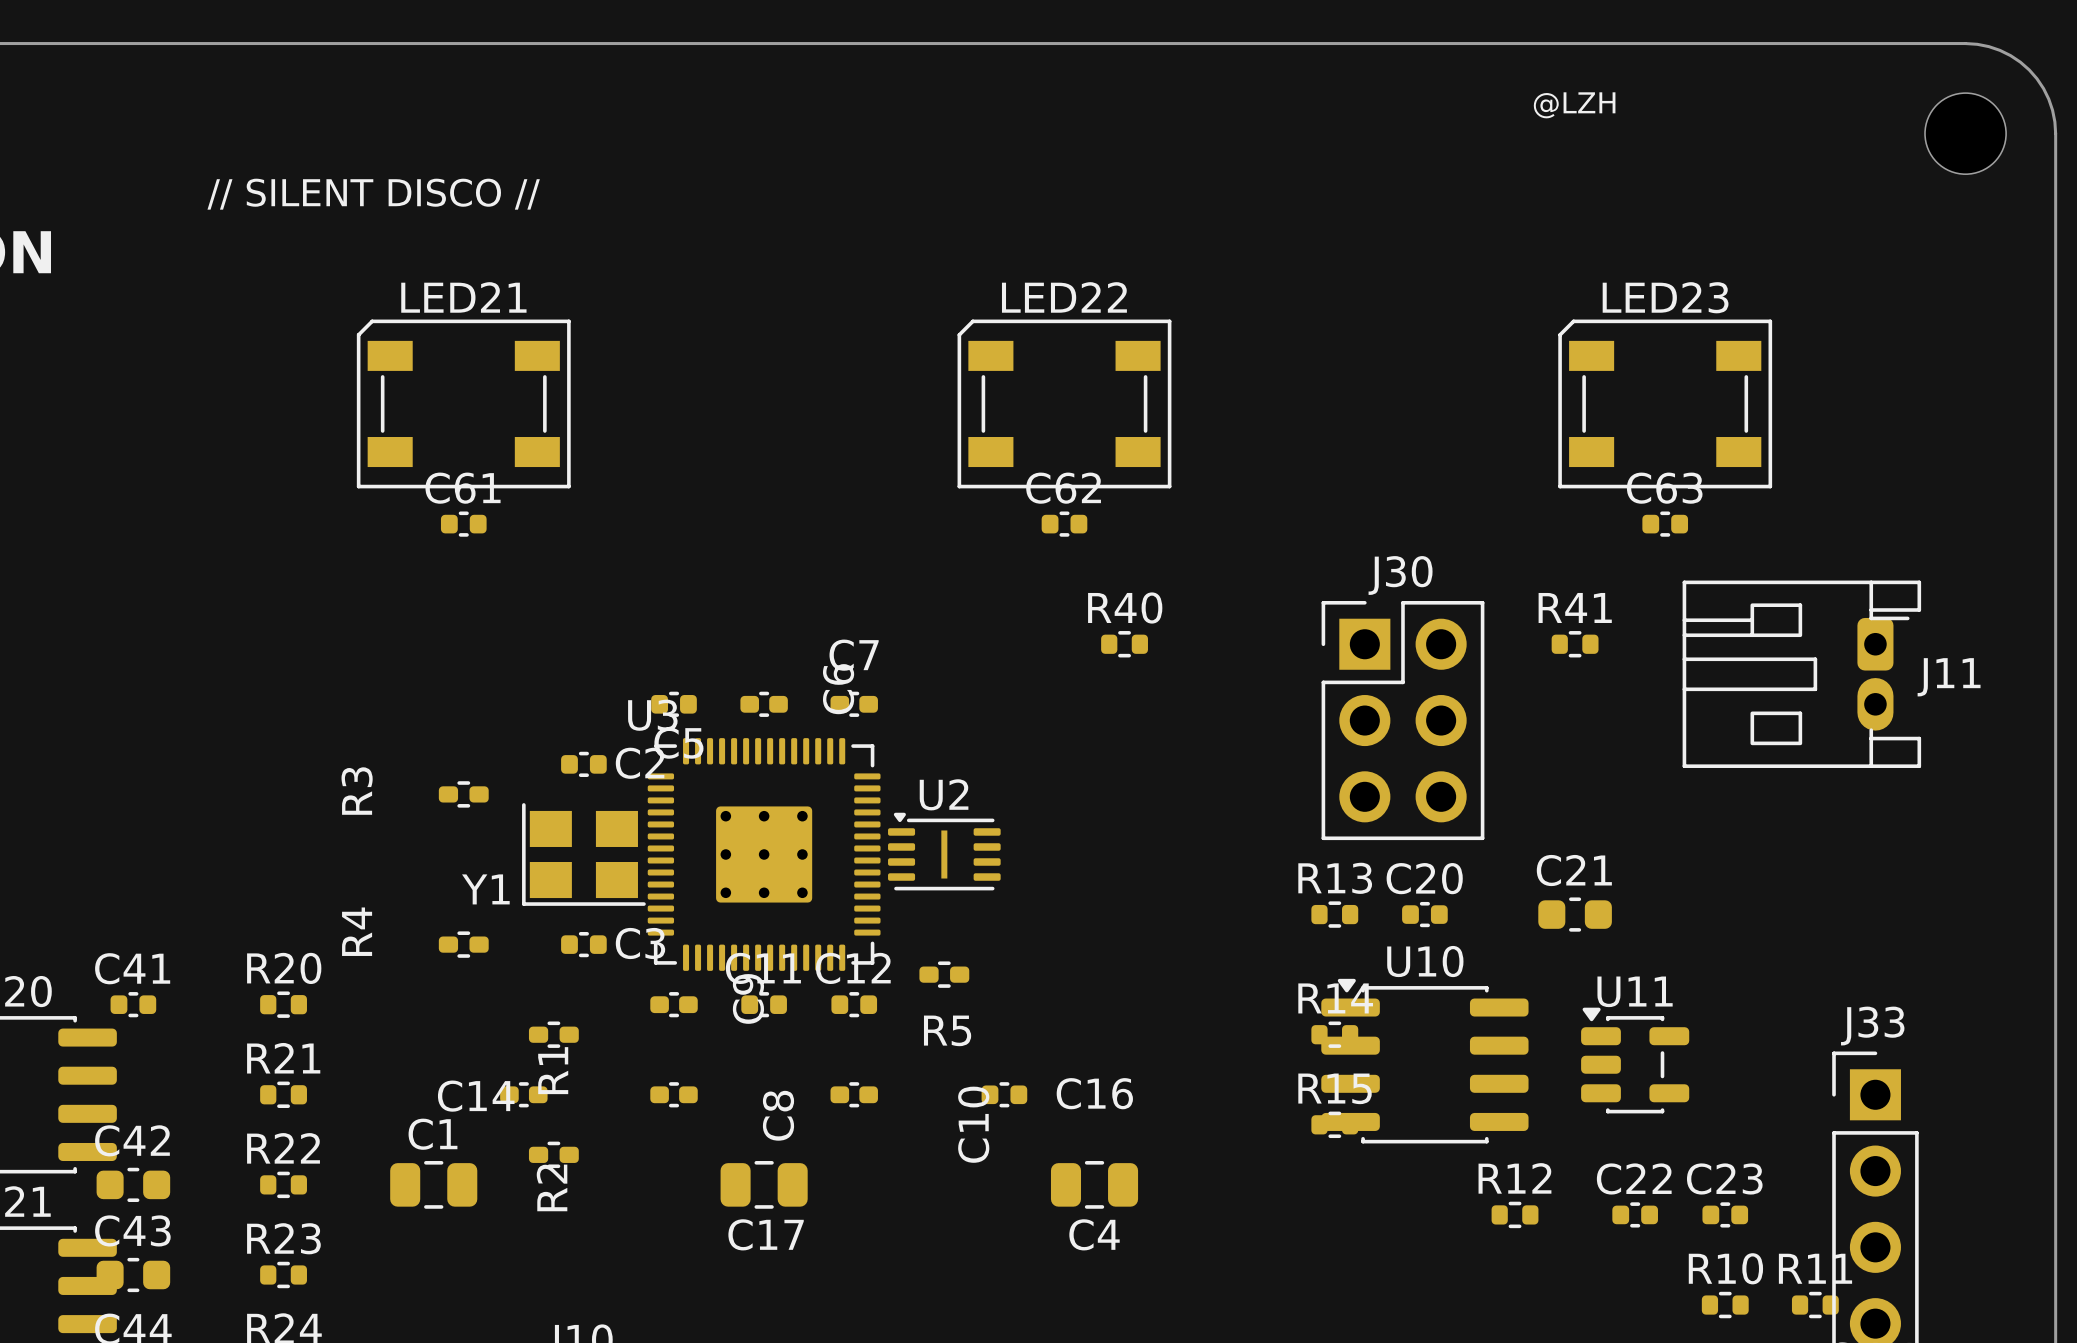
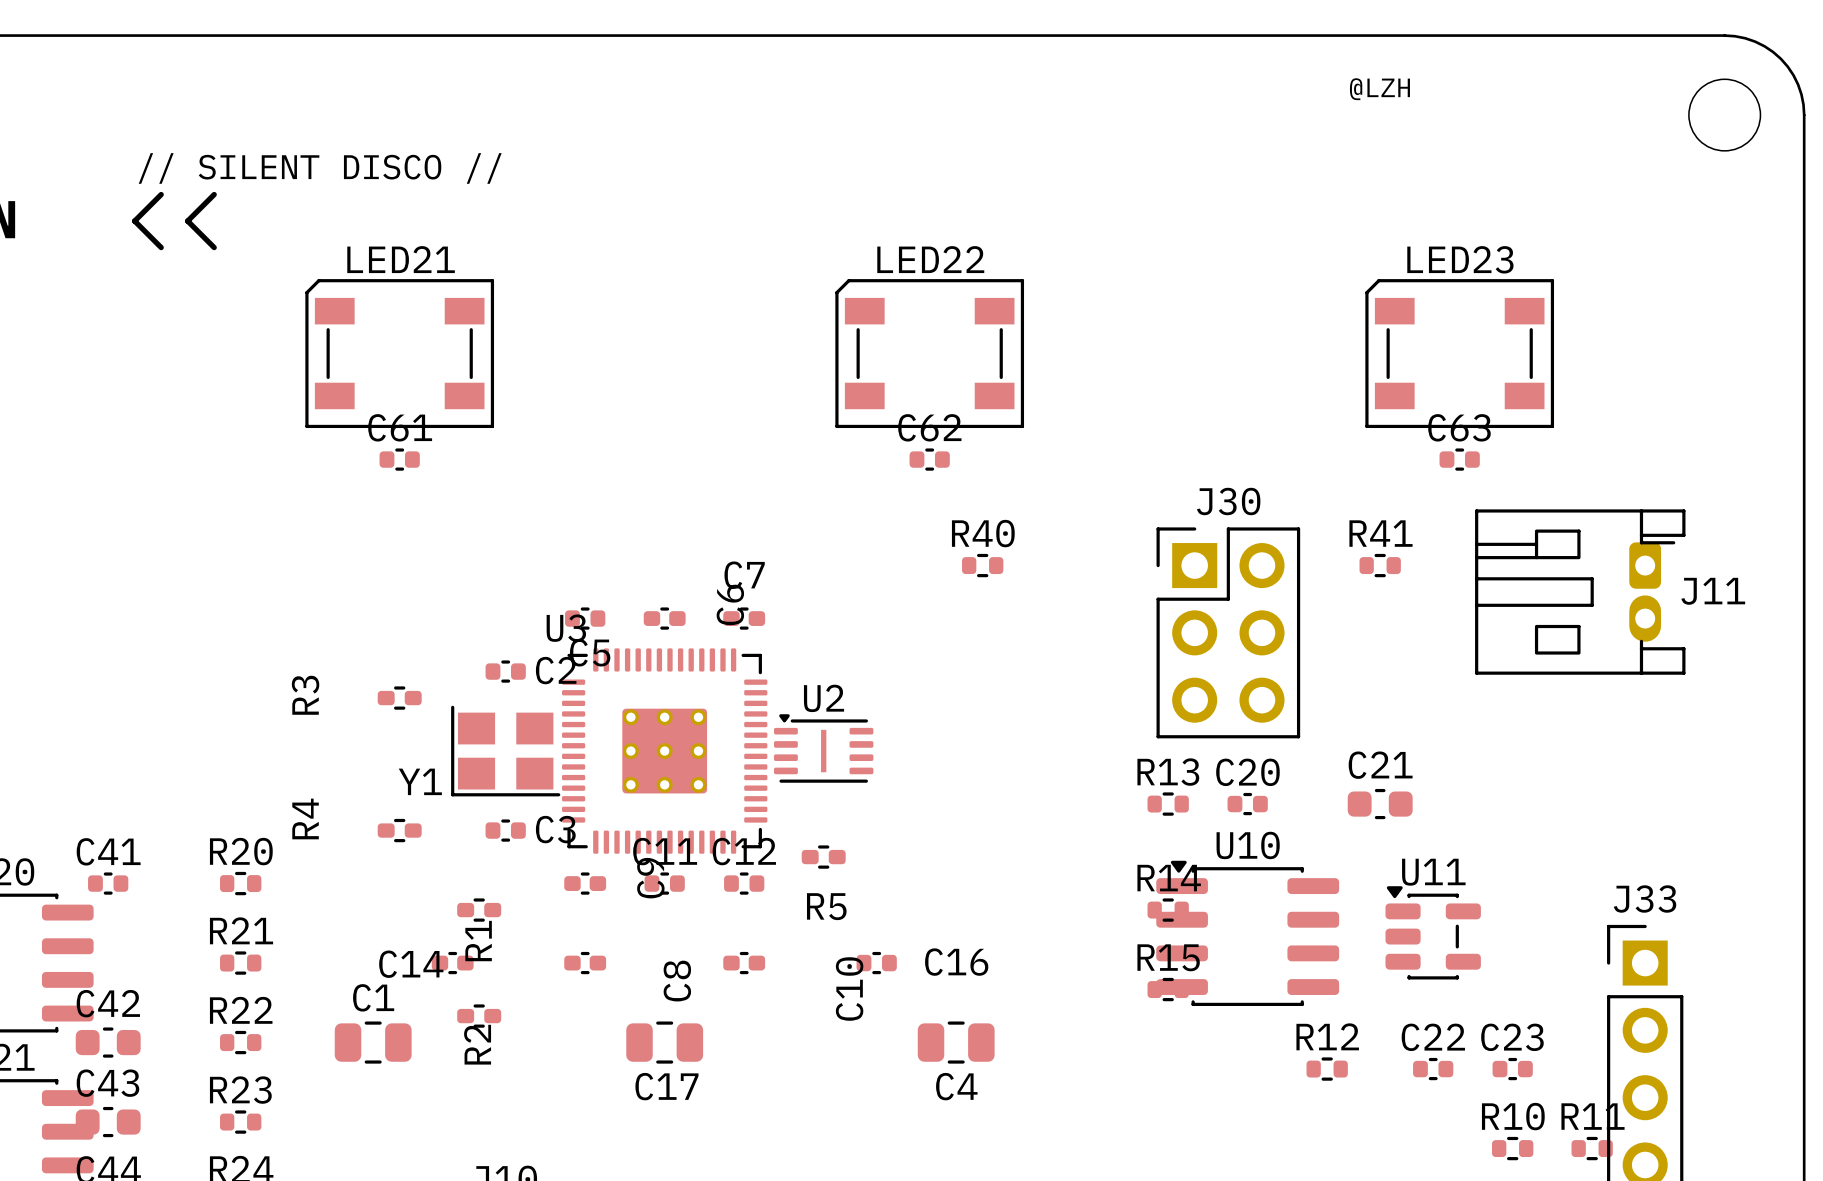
line: none -> (161, 194) (134, 221) (161, 247)
line: none -> (214, 194) (187, 221) (214, 247)

